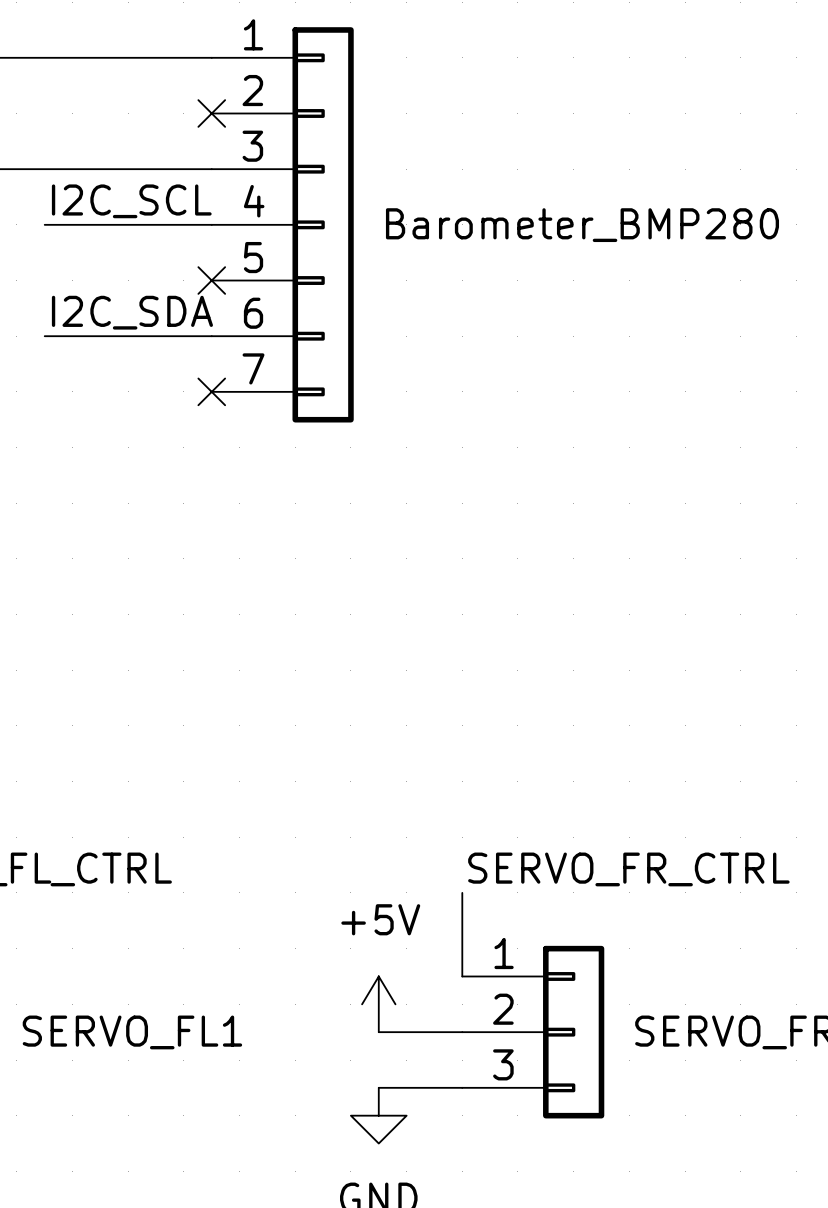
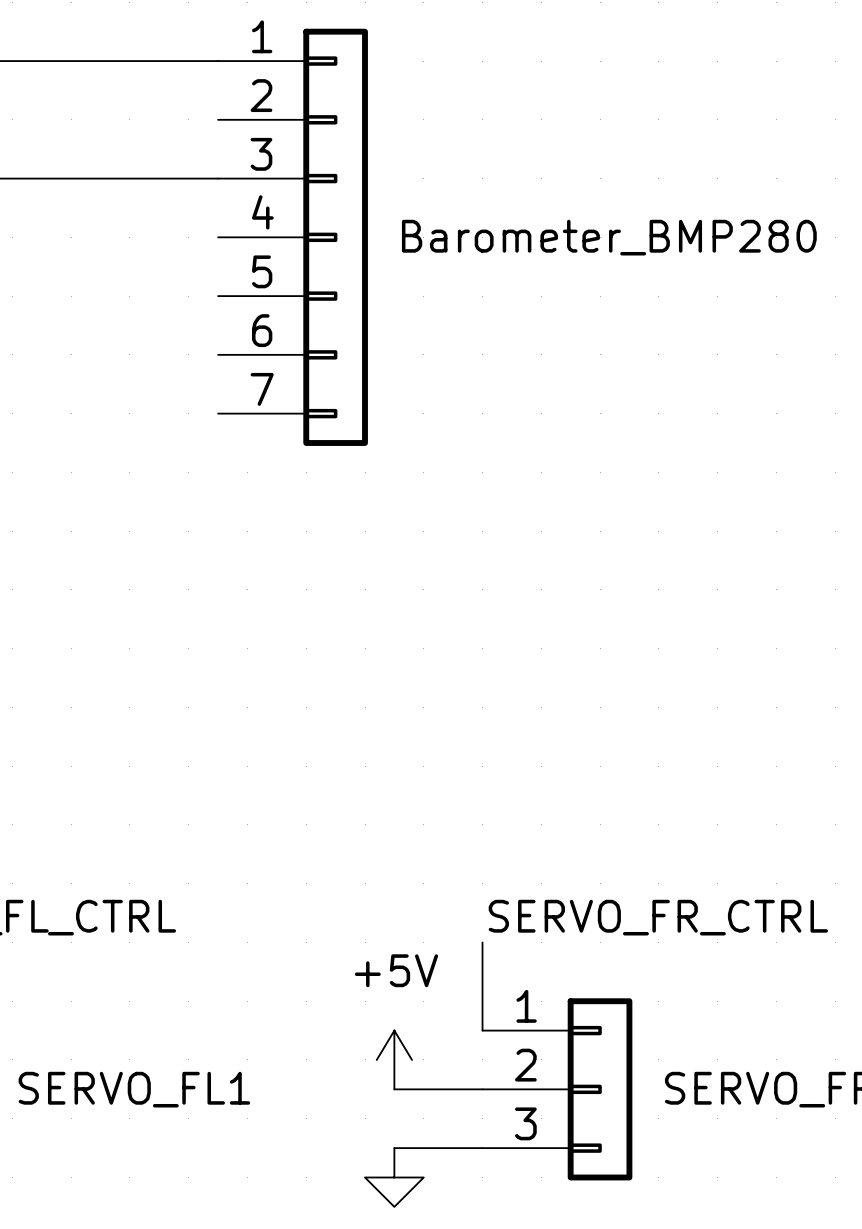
no-connect mark: (211, 113) -> none
label: I2C_SCL (131, 201) -> none
wire: (44, 224) (211, 224) -> none
no-connect mark: (211, 280) -> none
label: I2C_SDA (132, 312) -> none
wire: (44, 336) (211, 336) -> none
no-connect mark: (211, 391) -> none

